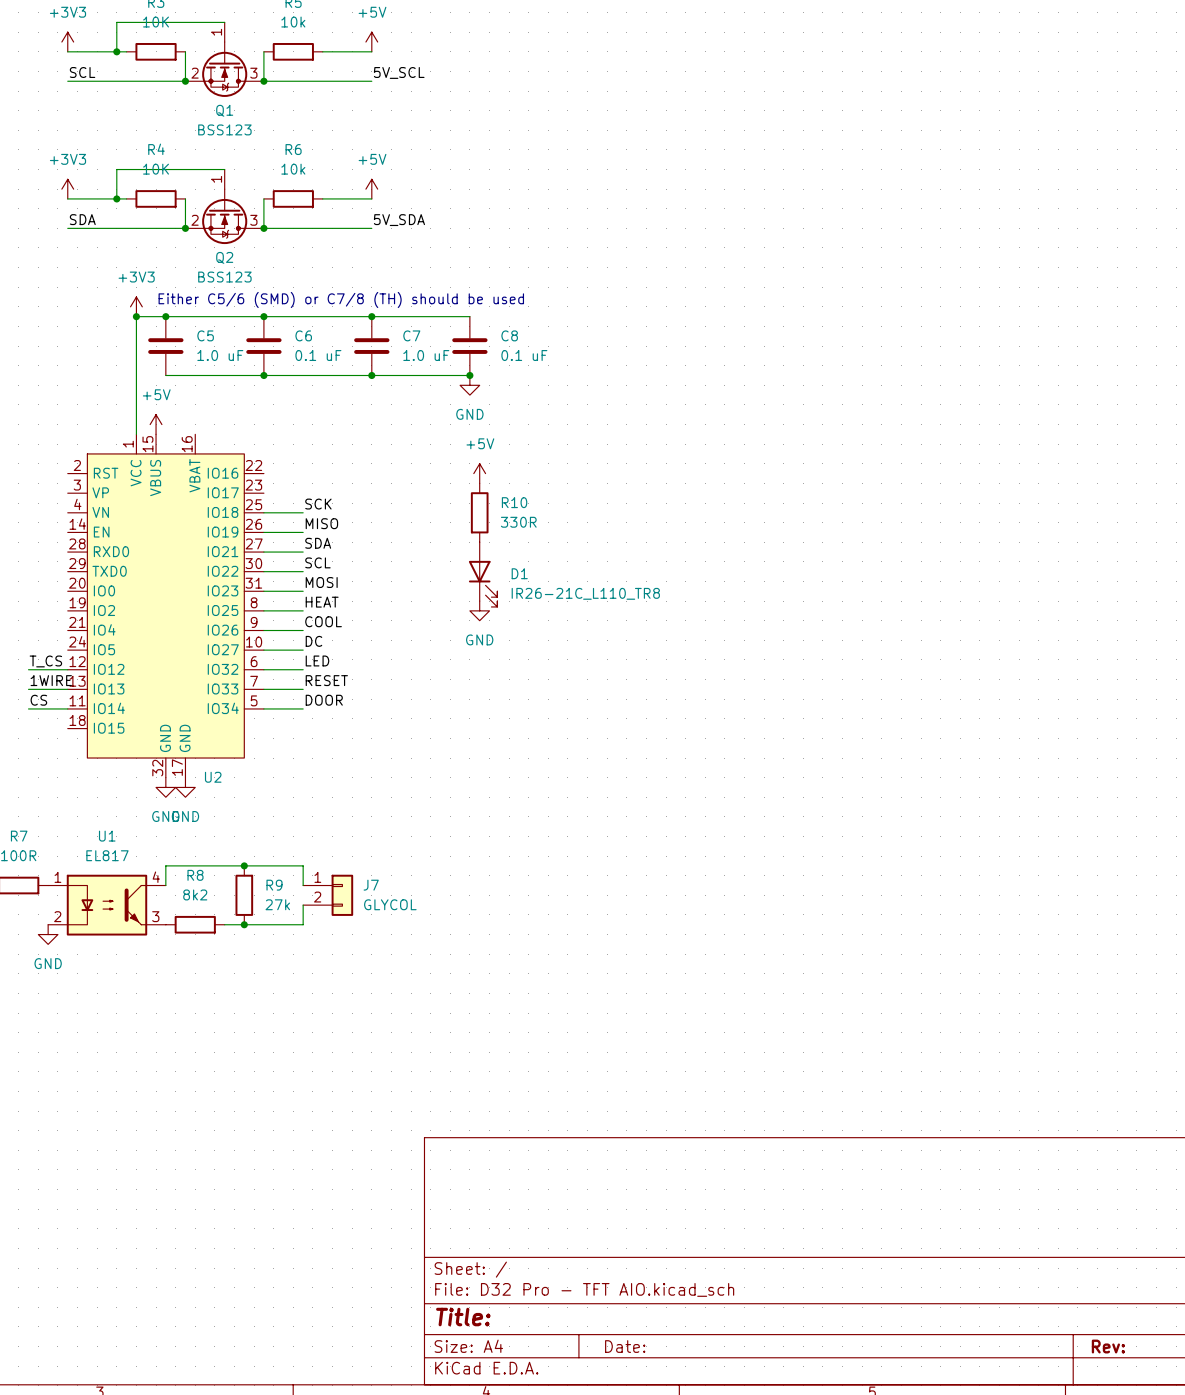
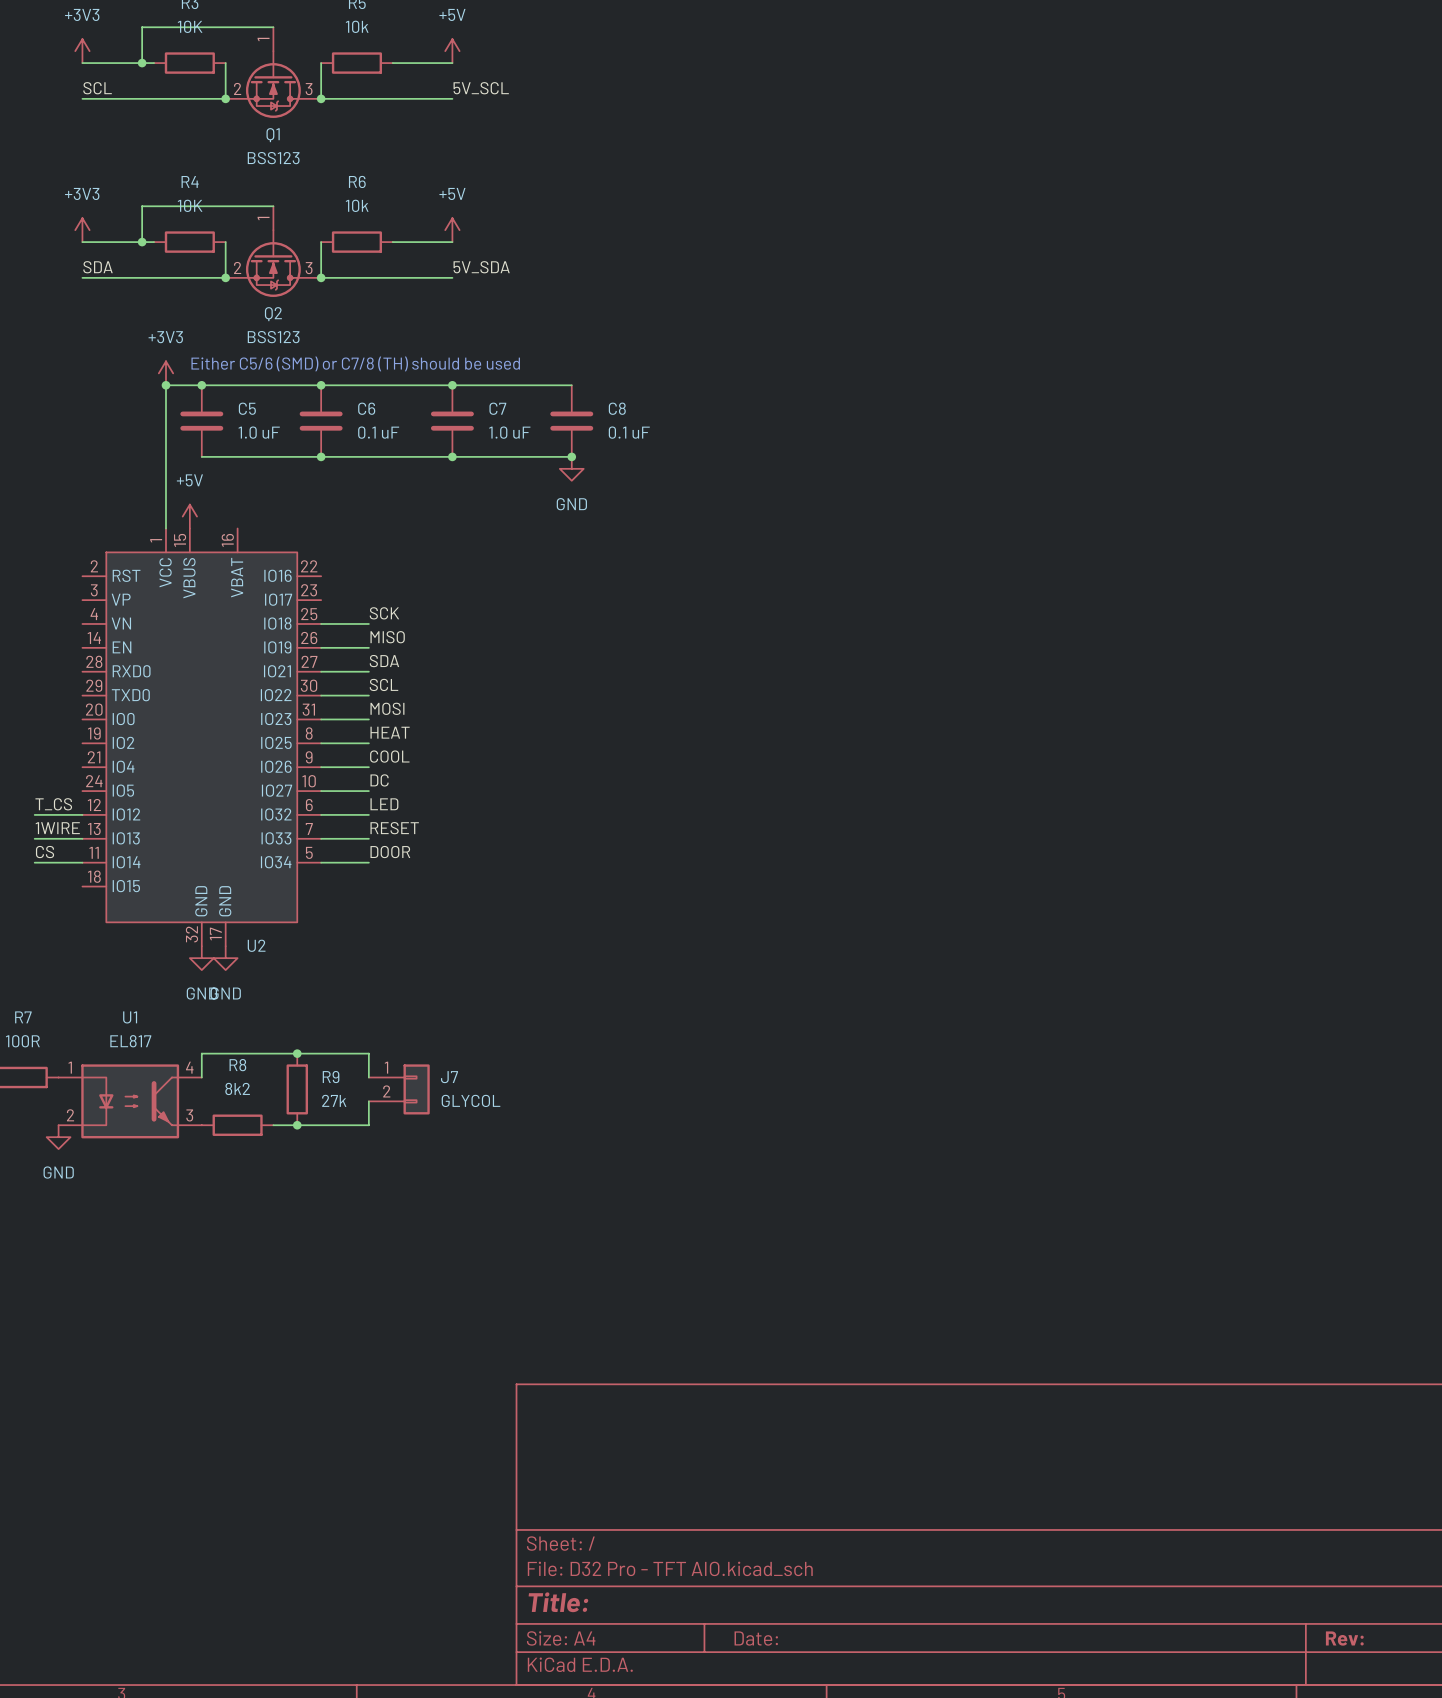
power symbol: +5V (479, 473) -> none
R10: 330R (479, 512) -> none
D1: IR26-21C_L110_TR8 (483, 574) -> none
power symbol: GND (479, 610) -> none

